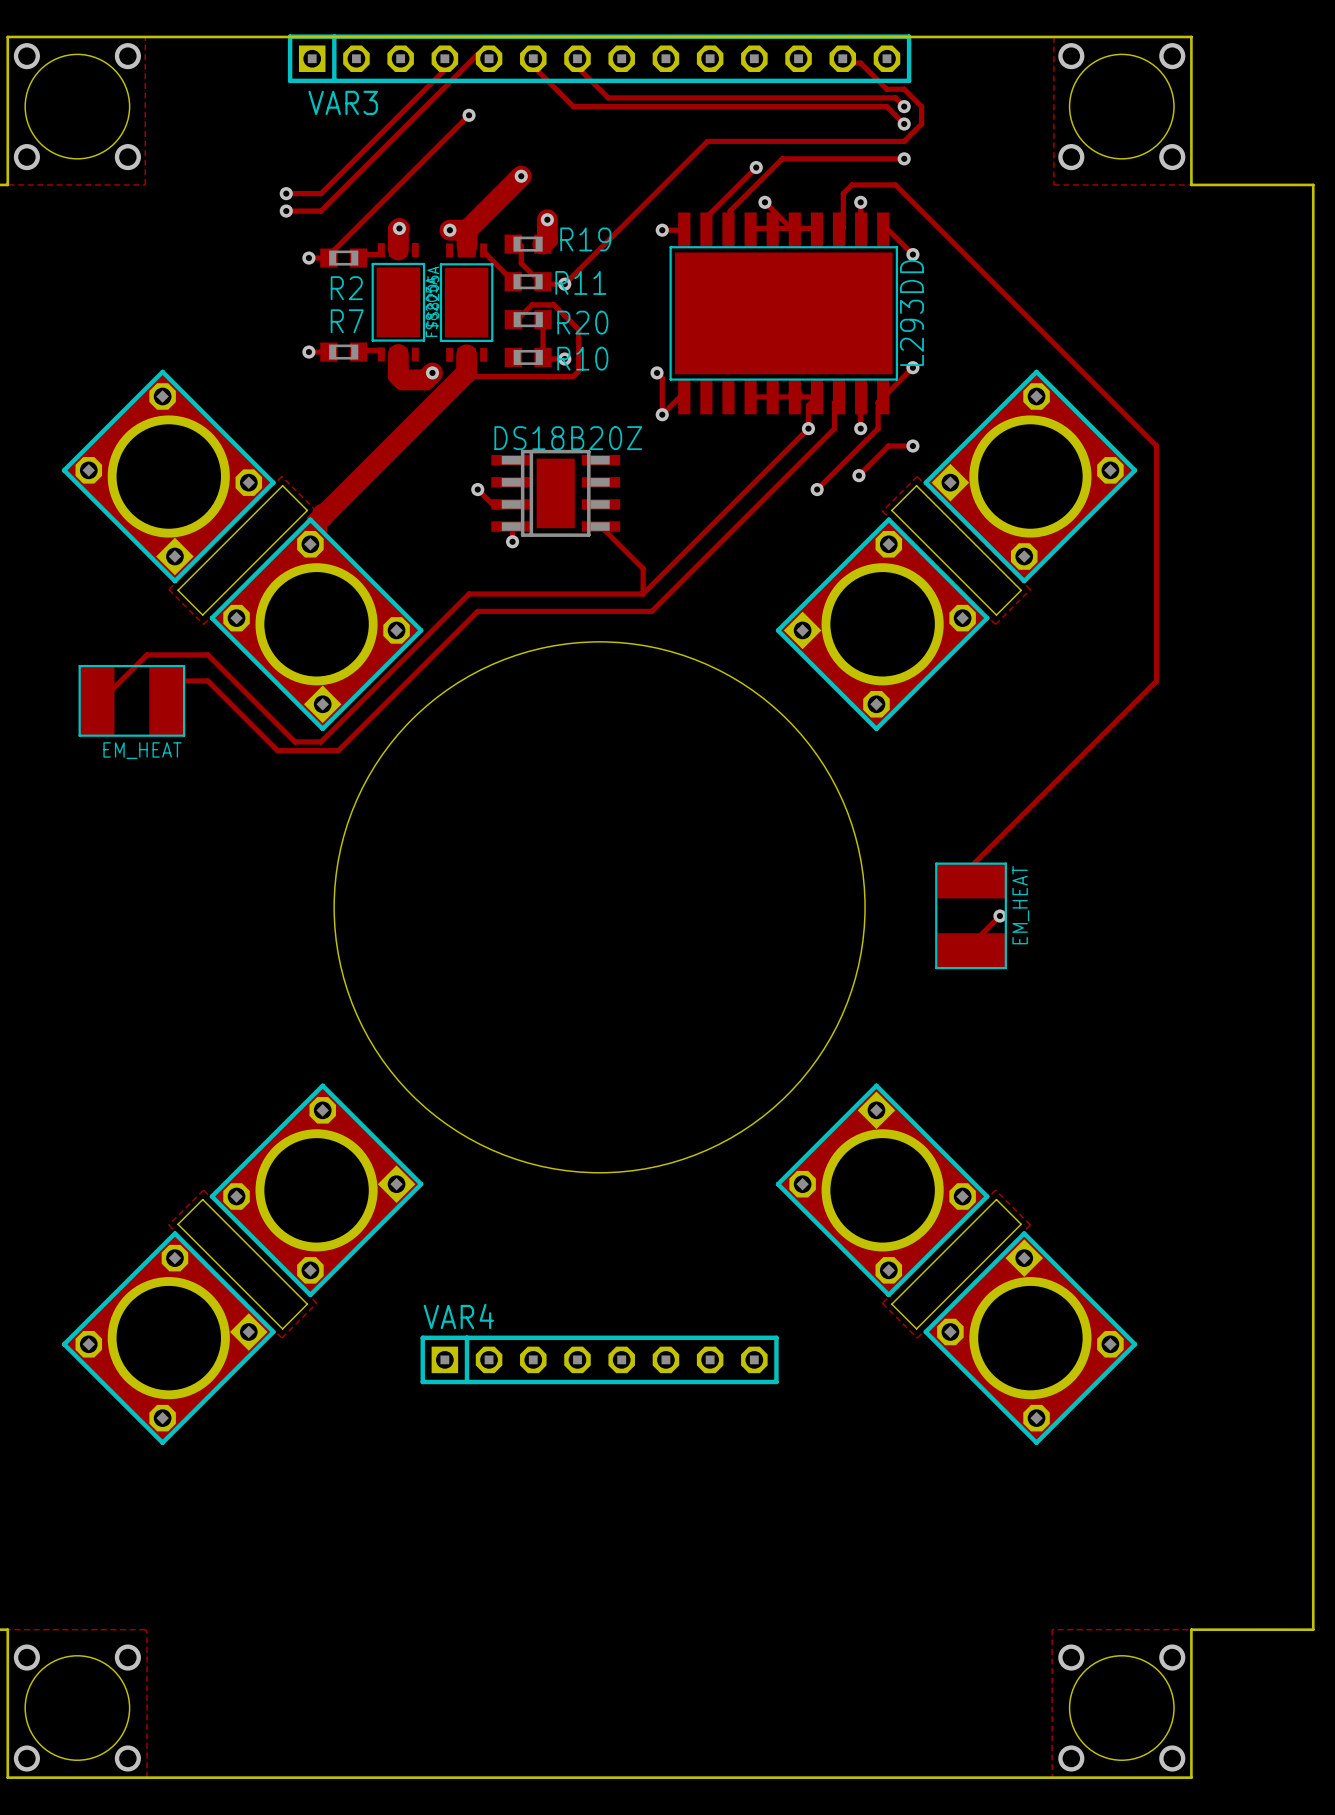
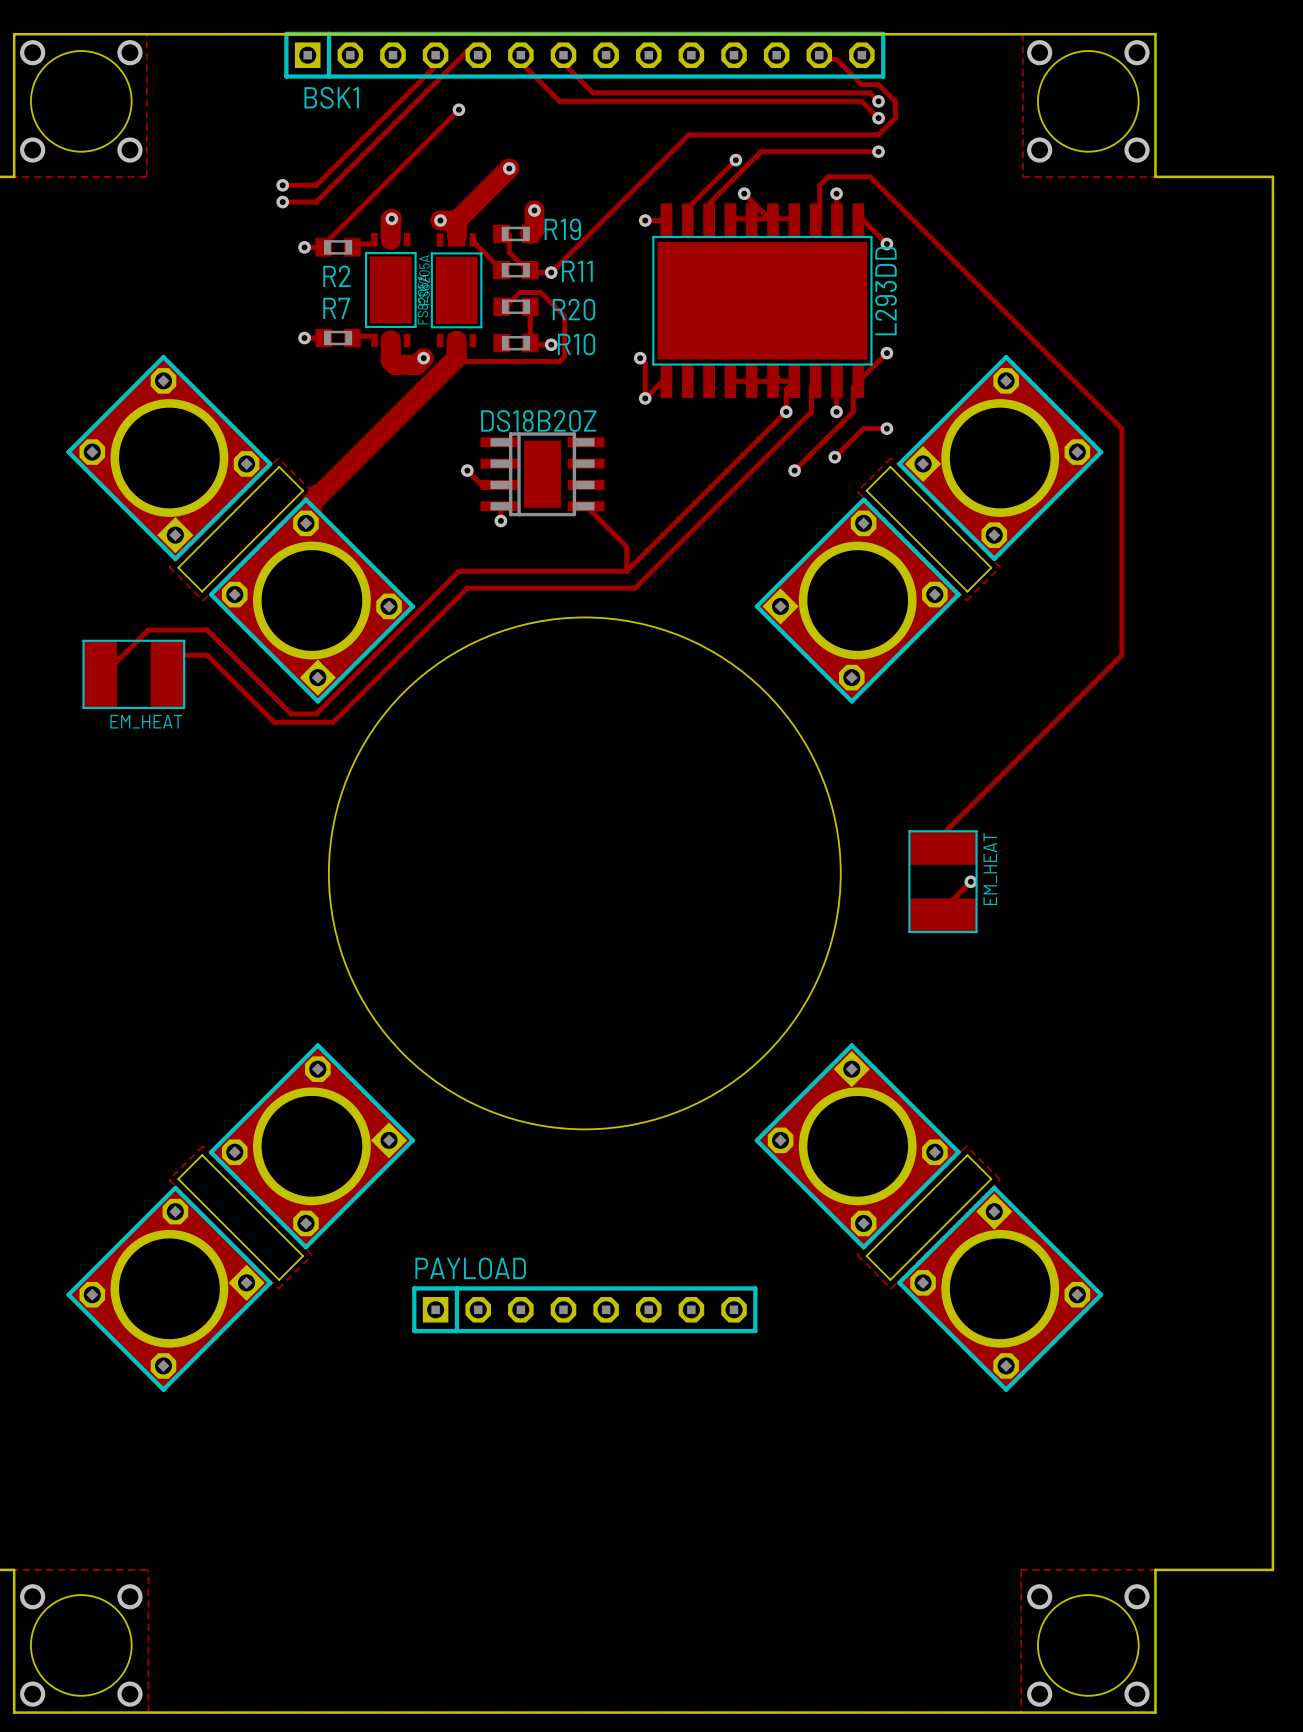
VAR3 name: VAR3 (343, 102) -> BSK1 (331, 97)
VAR4 name: VAR4 (458, 1316) -> PAYLOAD (470, 1268)

